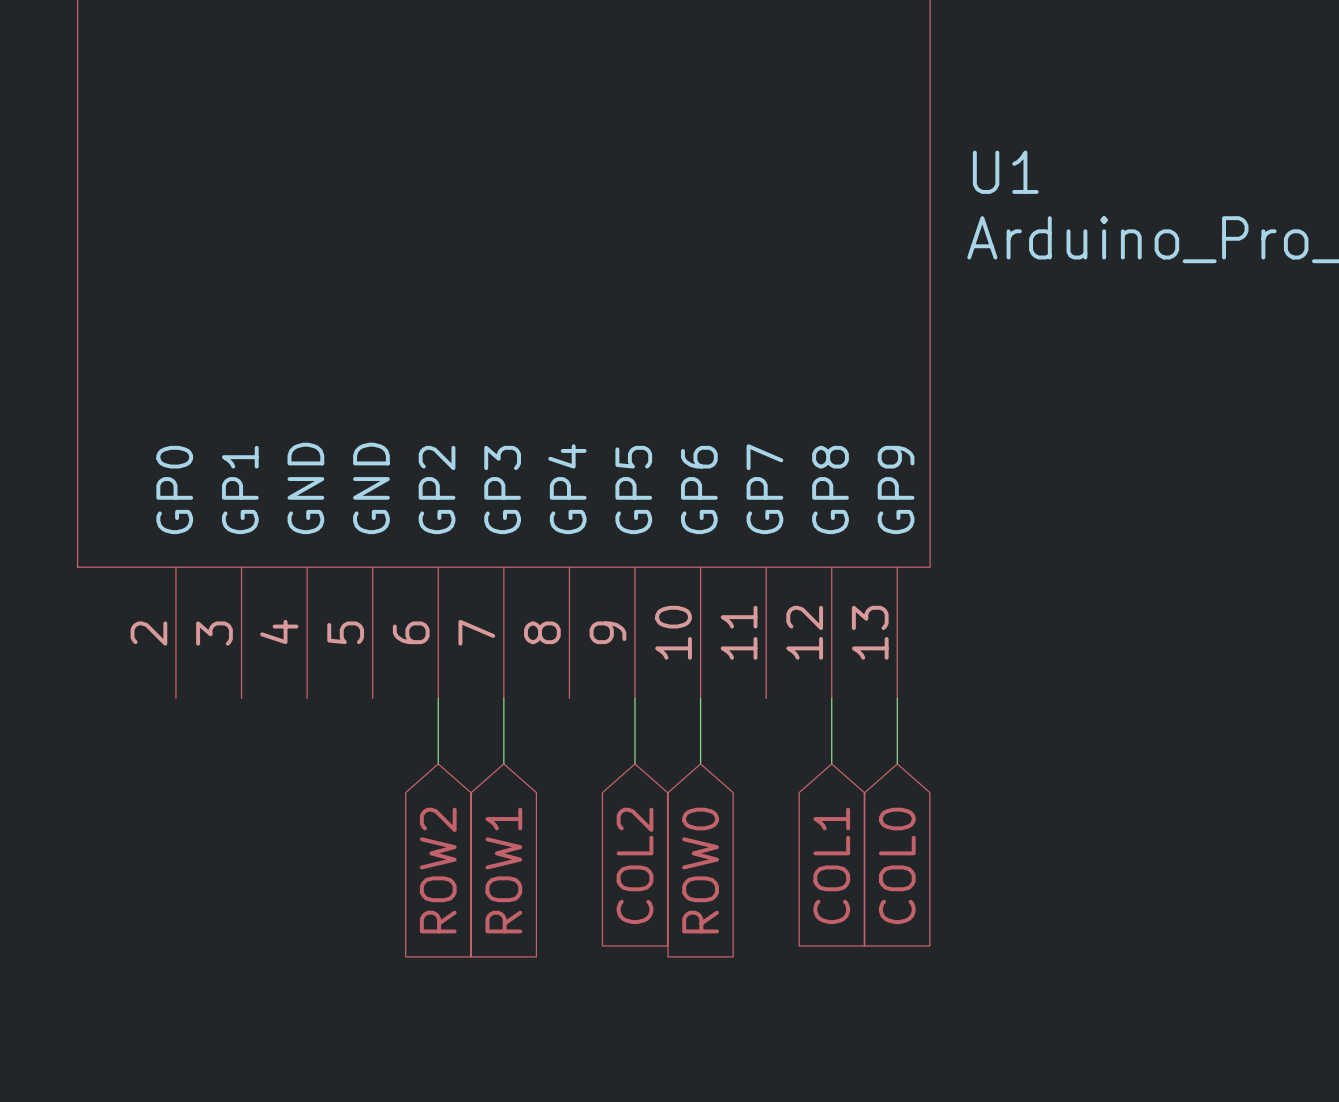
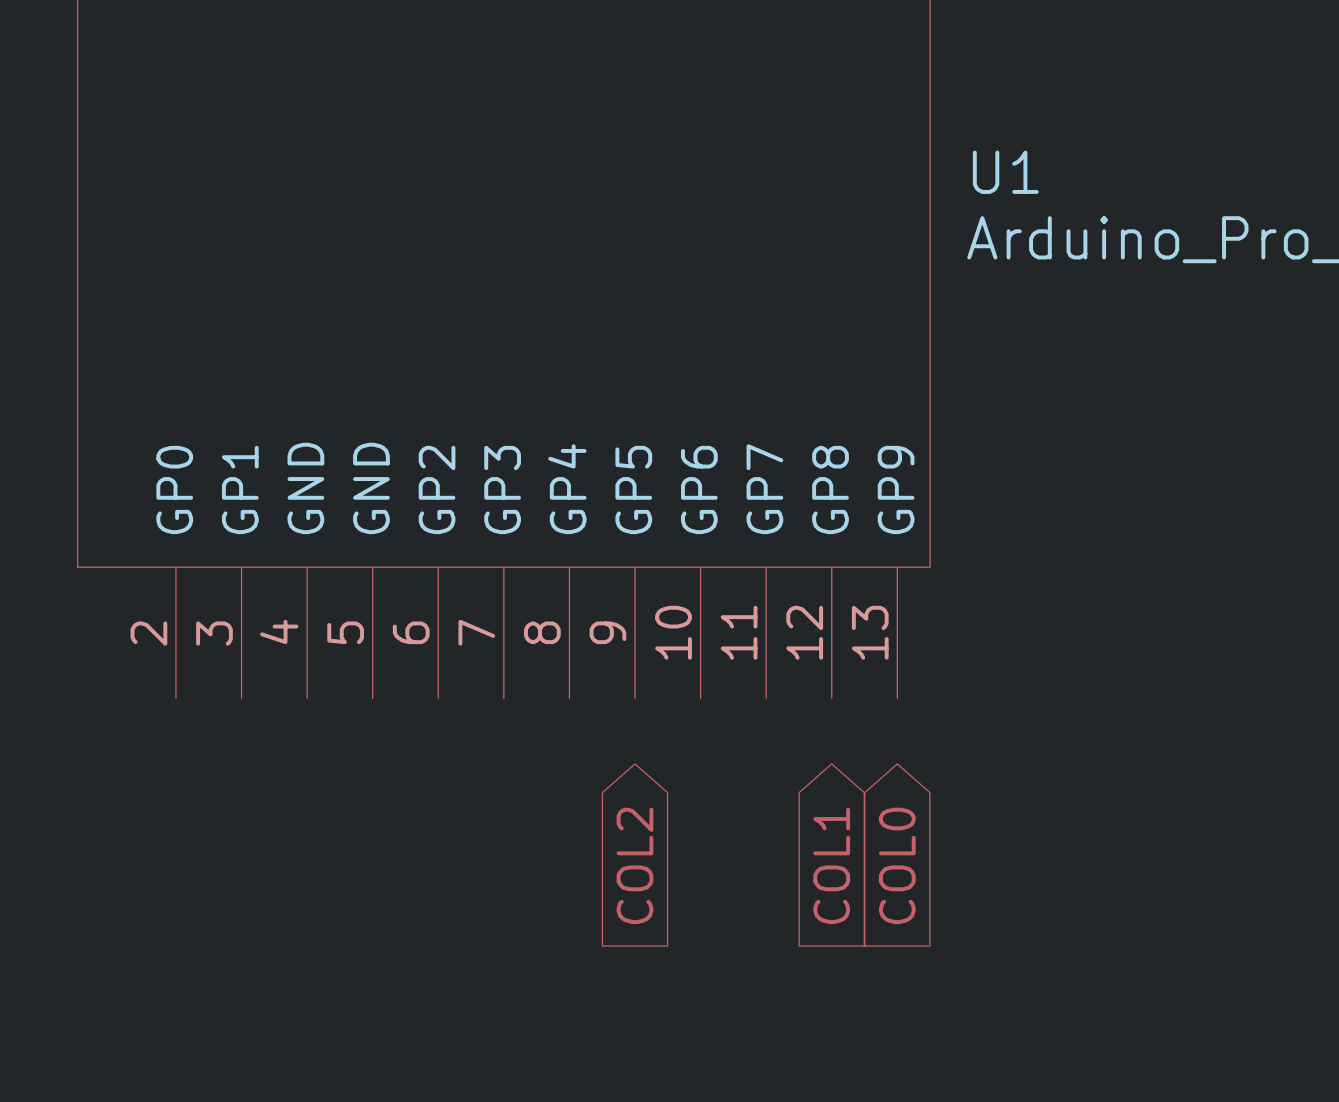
wire: (438, 698) (438, 763) -> none
wire: (503, 698) (503, 763) -> none
wire: (635, 698) (635, 763) -> none
wire: (700, 698) (700, 763) -> none
wire: (831, 698) (831, 763) -> none
wire: (897, 698) (897, 763) -> none
global label: ROW2 (438, 870) -> none
global label: ROW1 (503, 870) -> none
global label: ROW0 (700, 870) -> none

